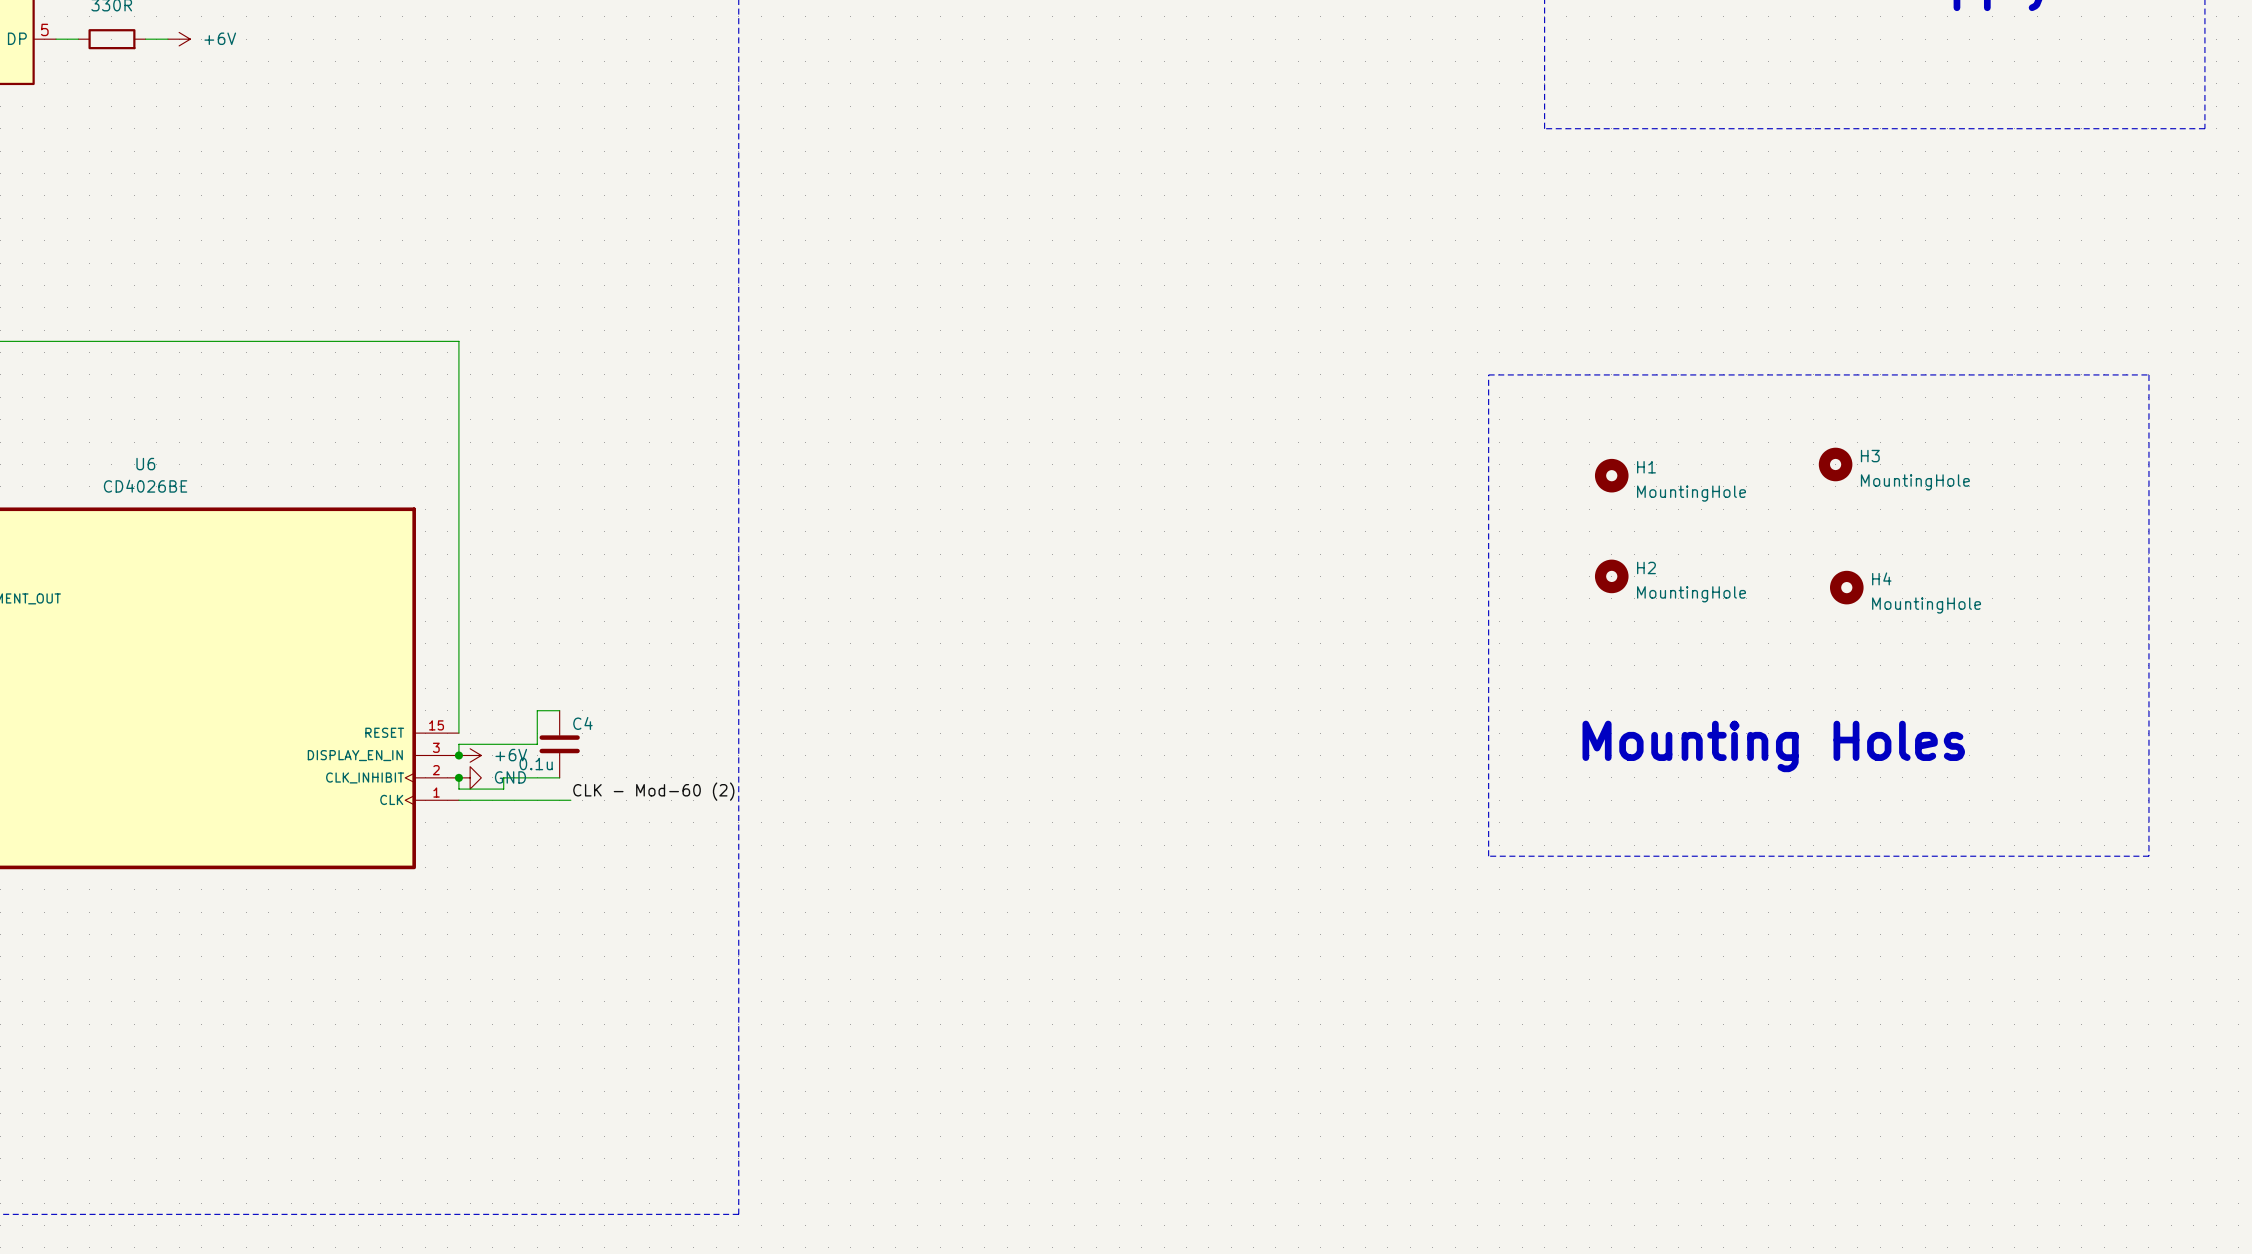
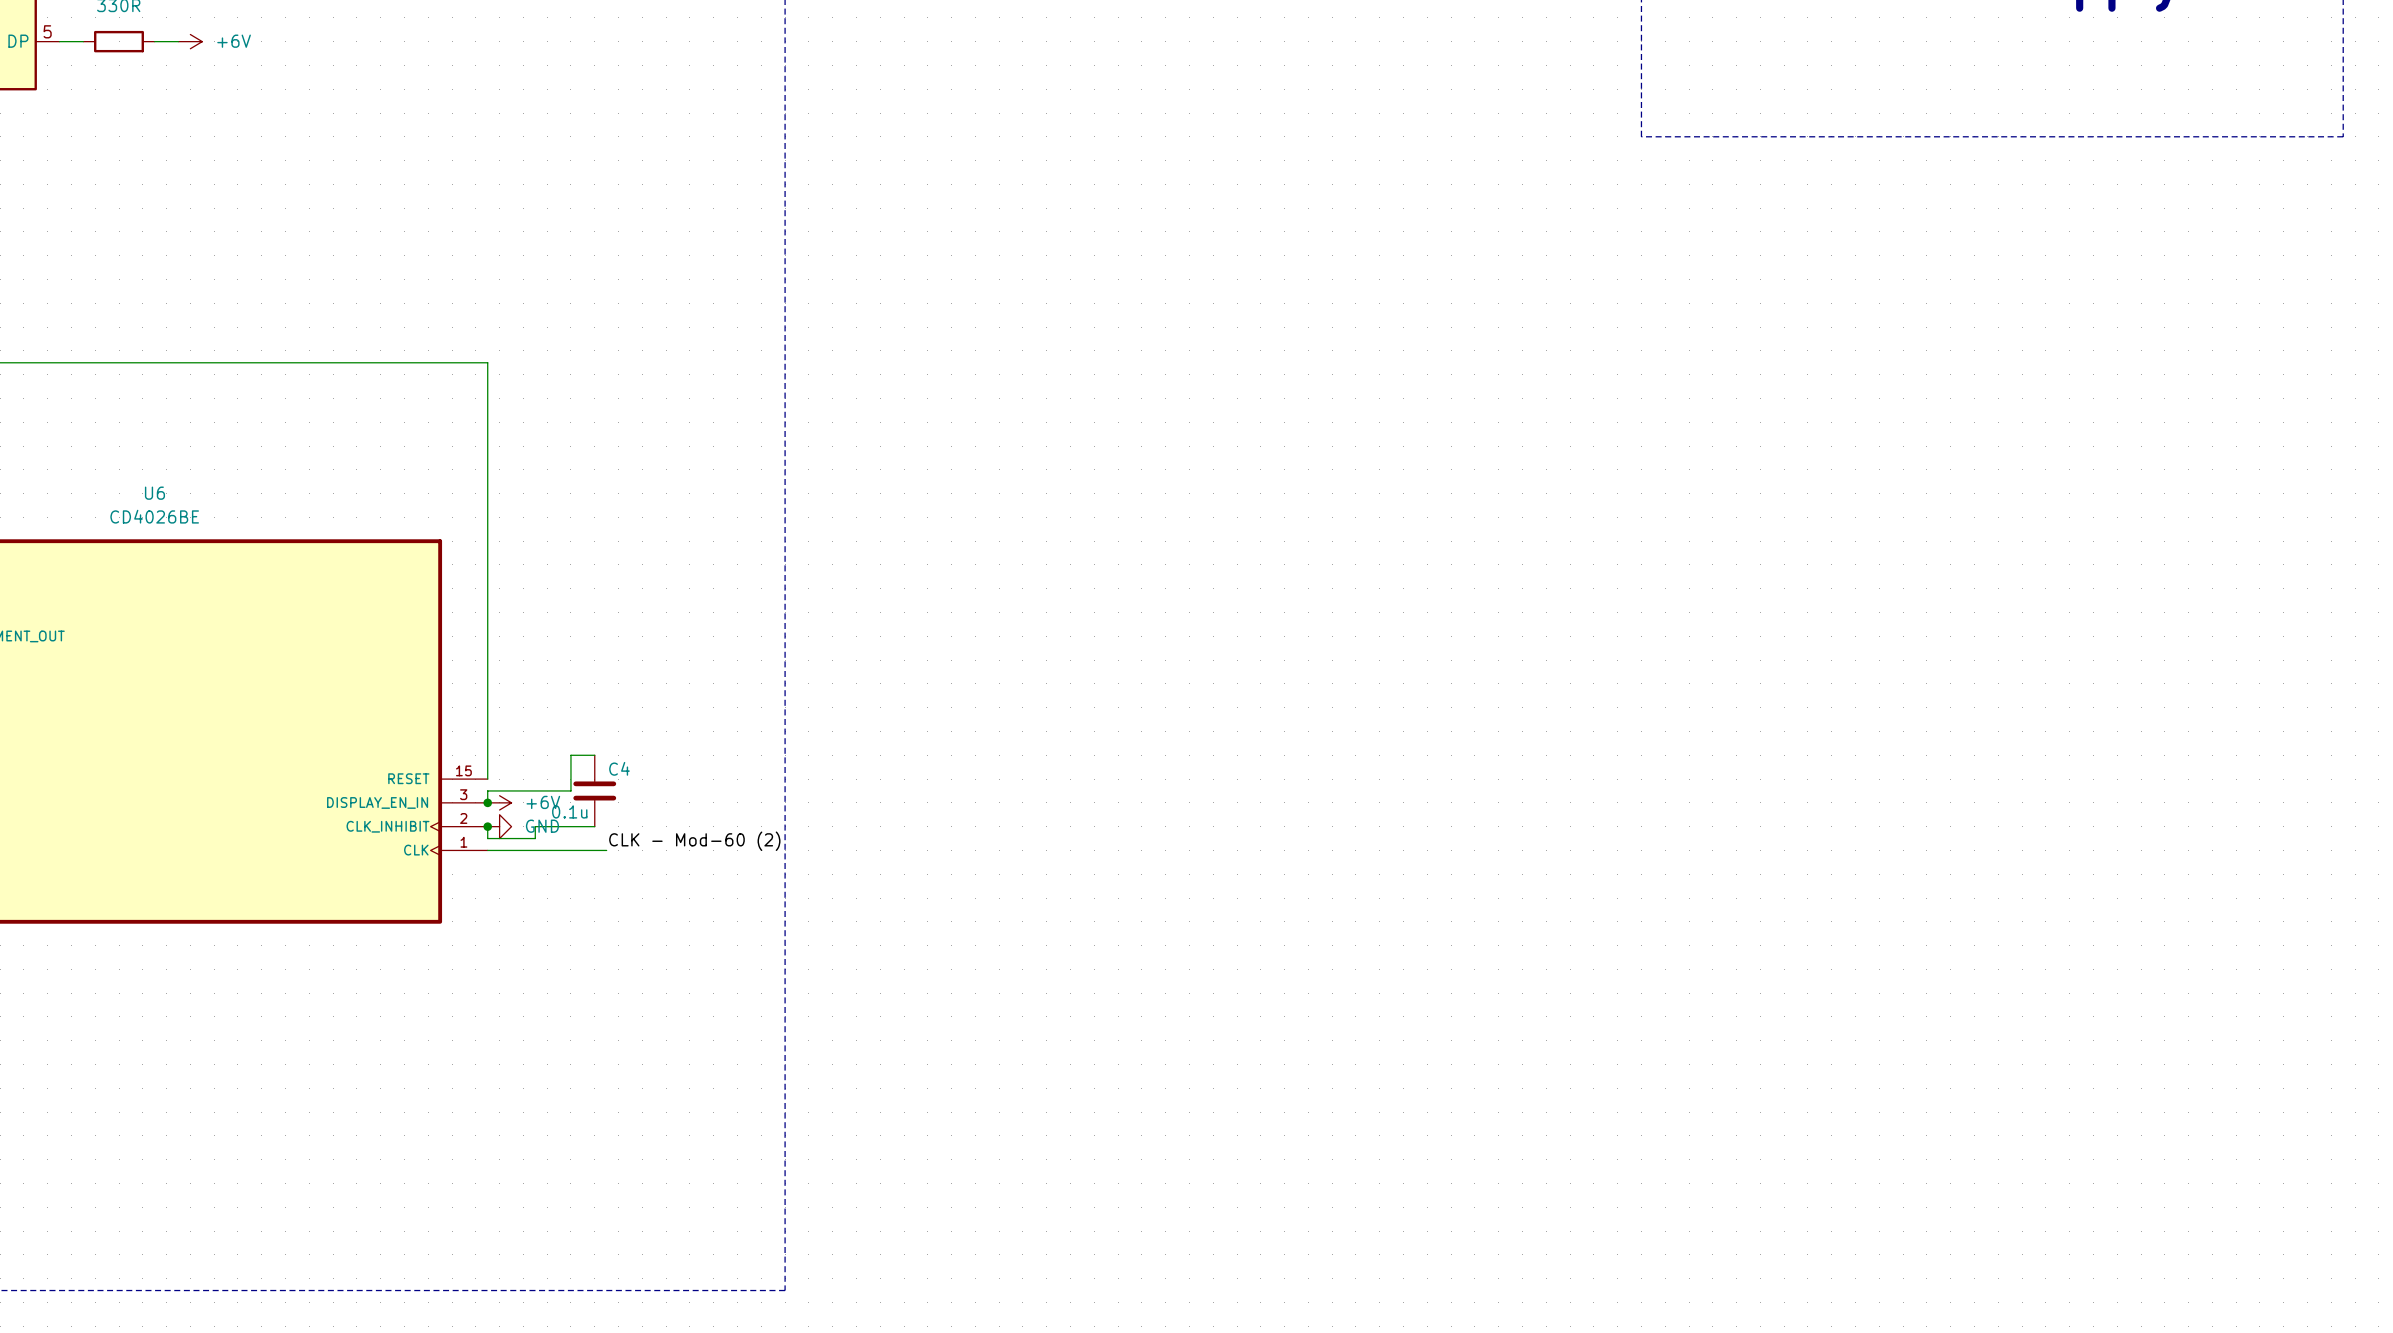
line: (1488, 374) (2148, 374) (2148, 856) (1488, 856) (1488, 374) -> none
H3: MountingHole (1835, 464) -> none
H1: MountingHole (1611, 475) -> none
H2: MountingHole (1611, 576) -> none
H4: MountingHole (1846, 587) -> none
text: Mounting Holes (1773, 746) -> none

